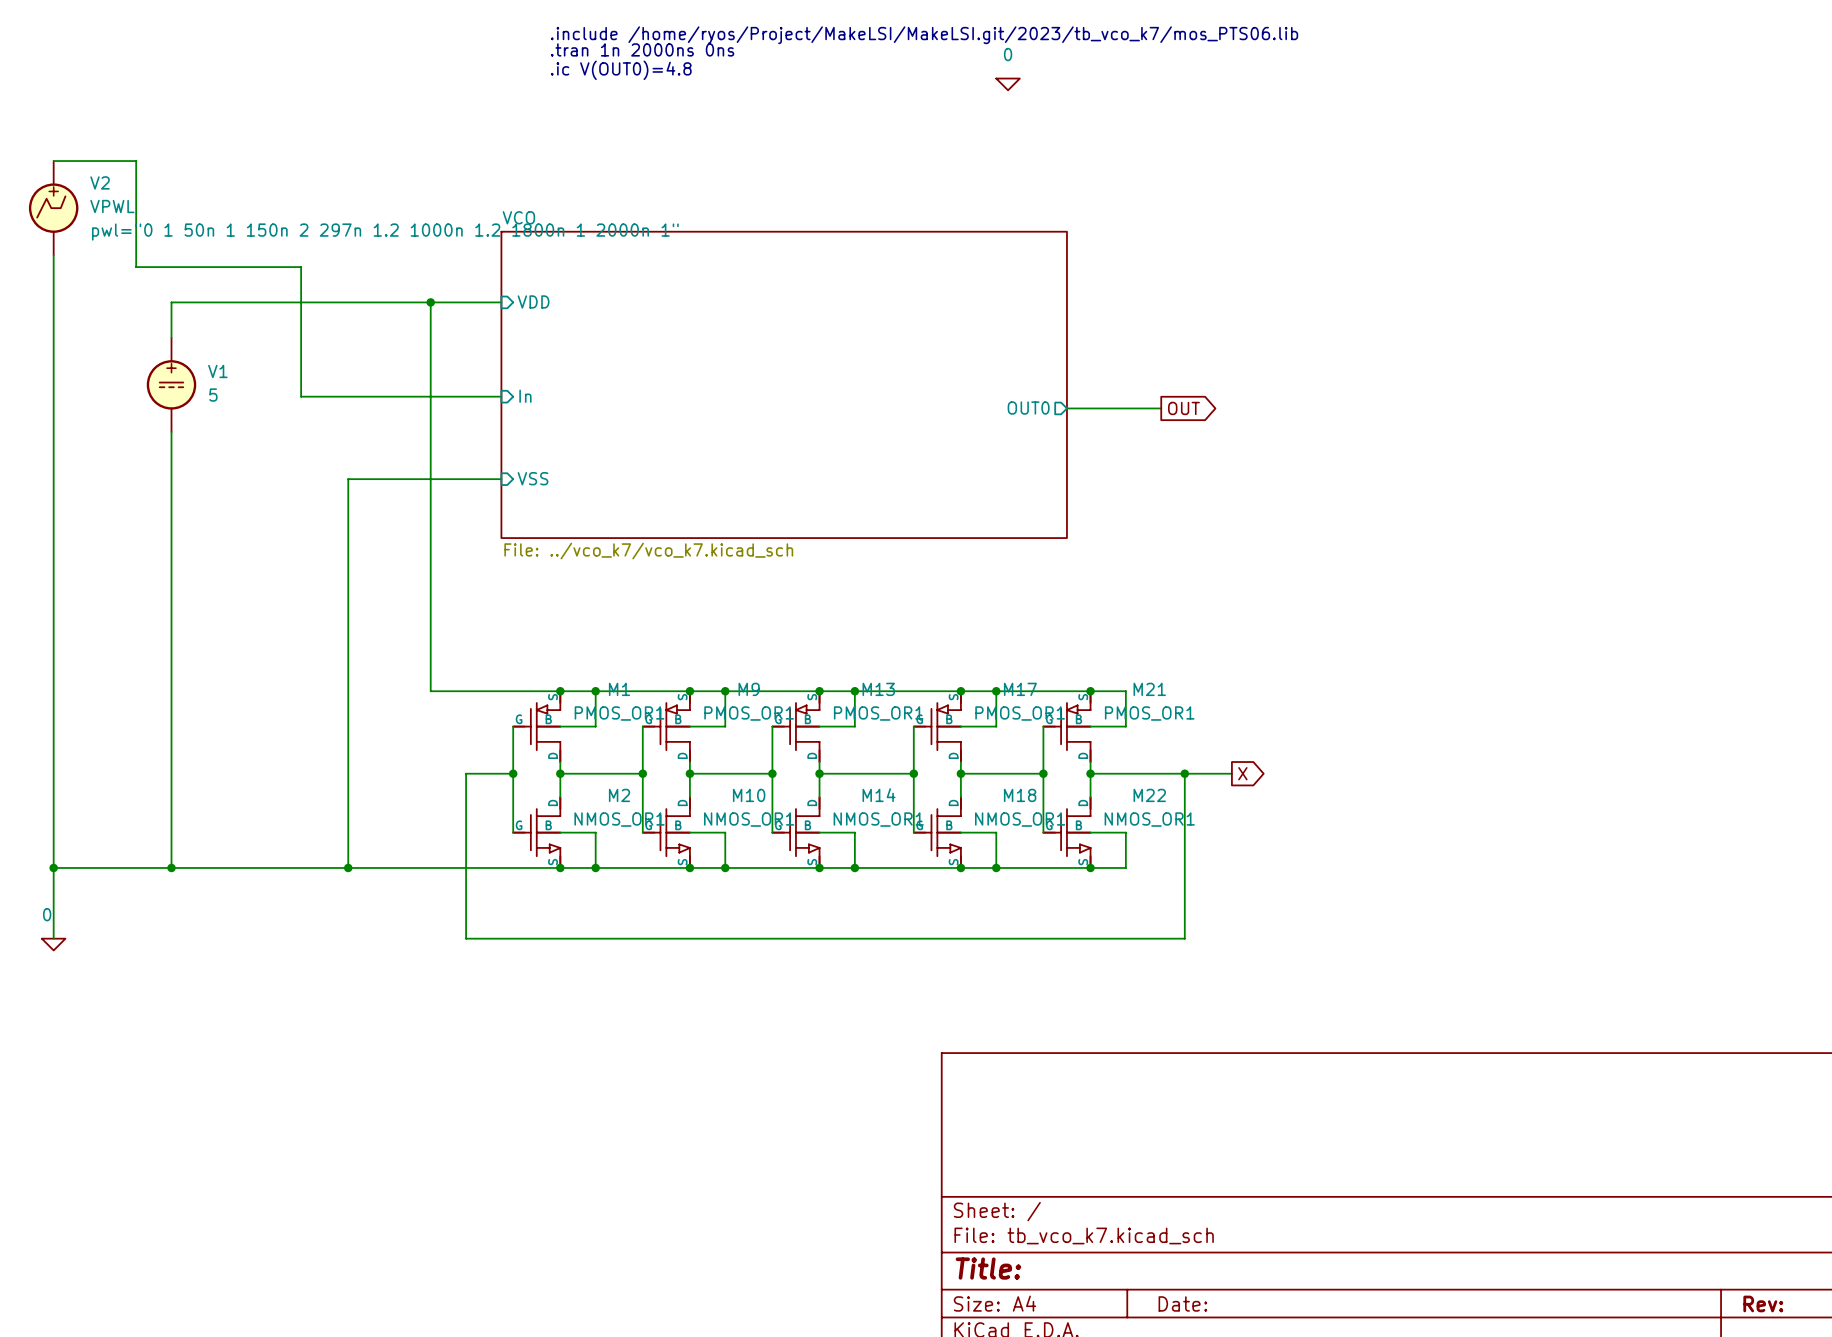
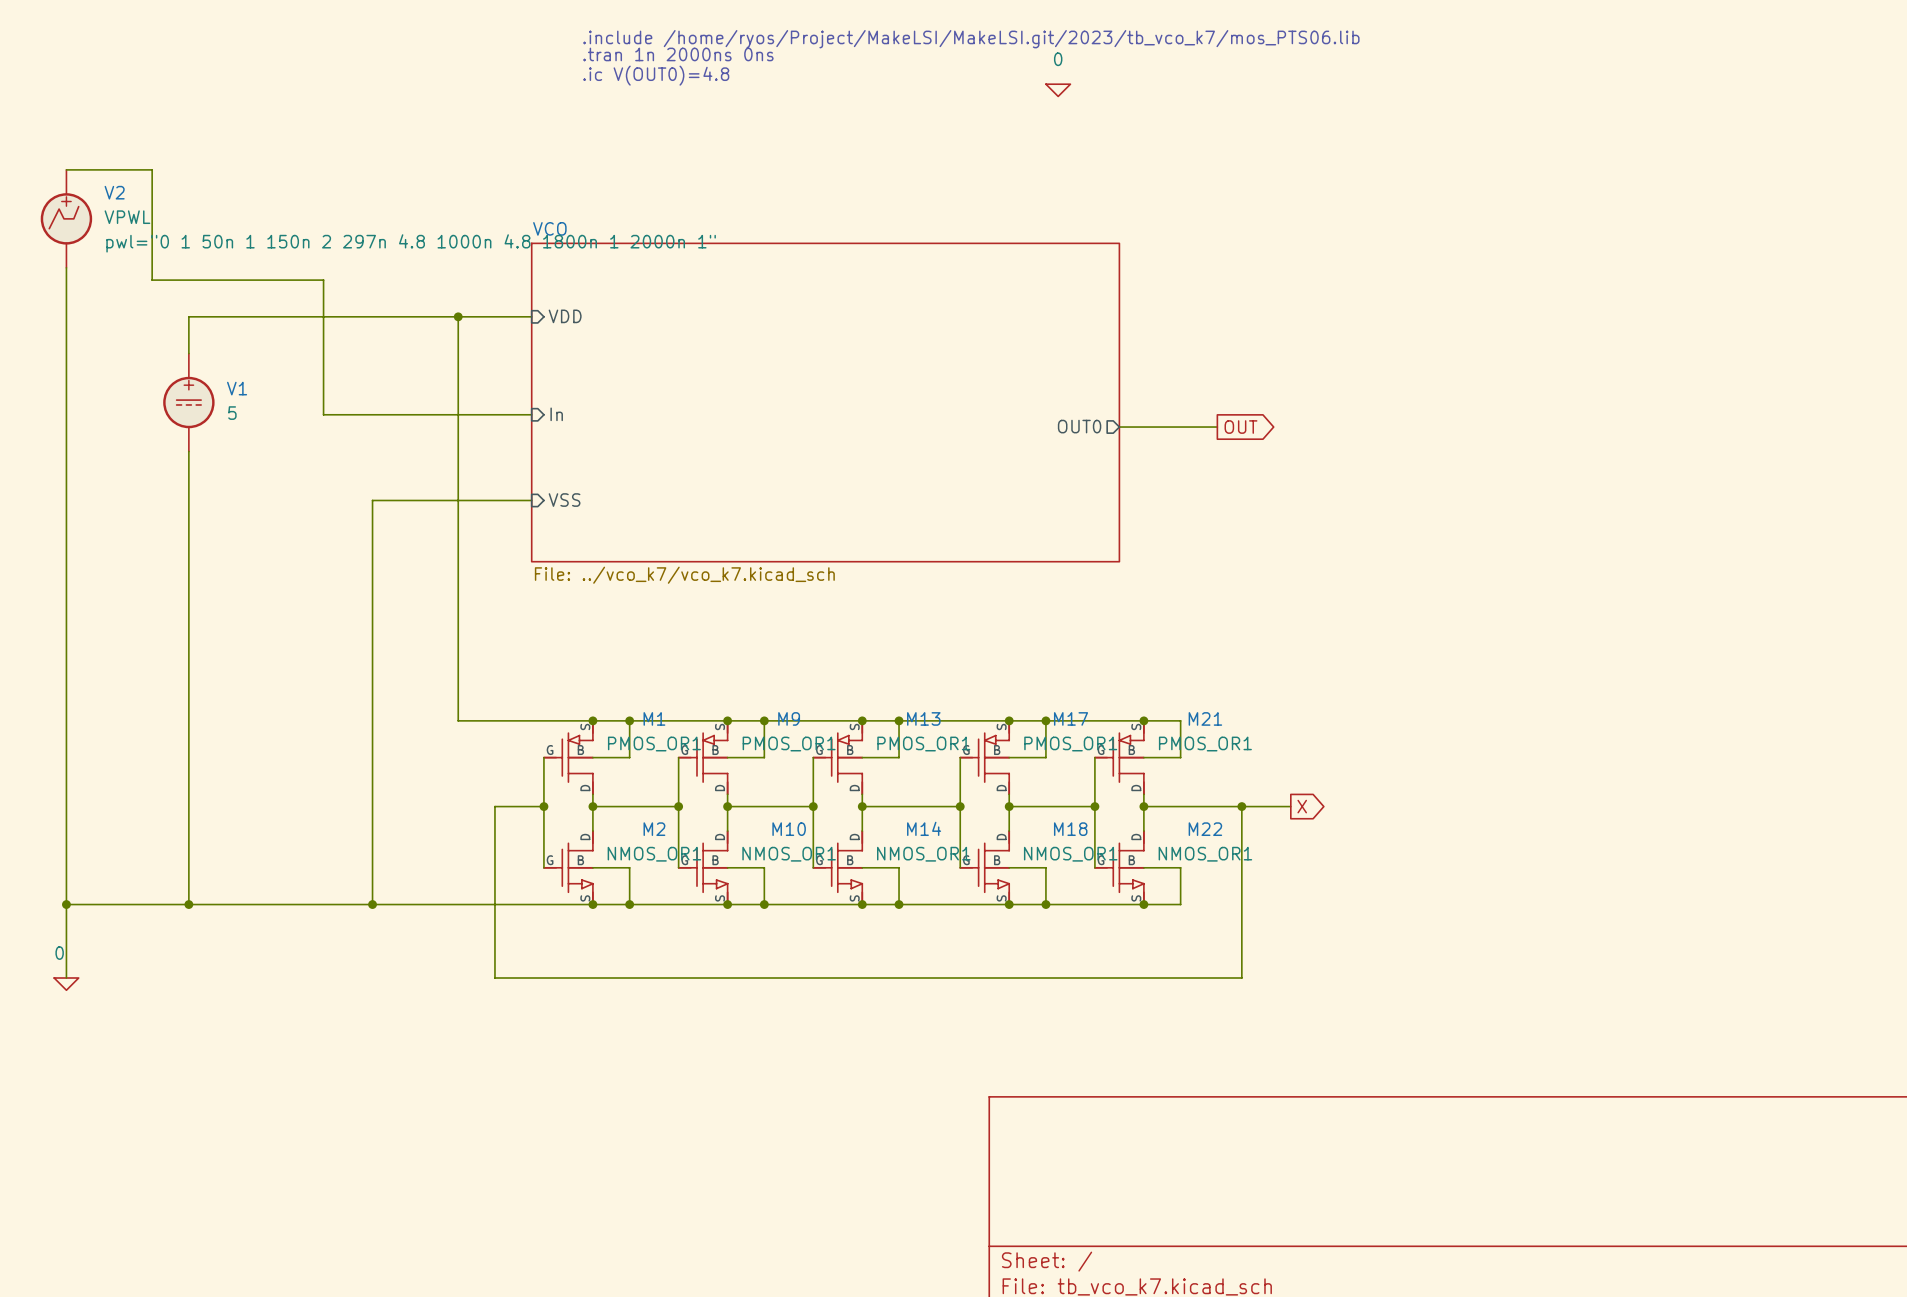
V2 text: pwl="0 1 50n 1 150n 2 297n 1.2 1000n 1.2 1800n 1 2000n 1" (385, 232) -> pwl="0 1 50n 1 150n 2 297n 4.8 1000n 4.8 1800n 1 2000n 1" (411, 243)

